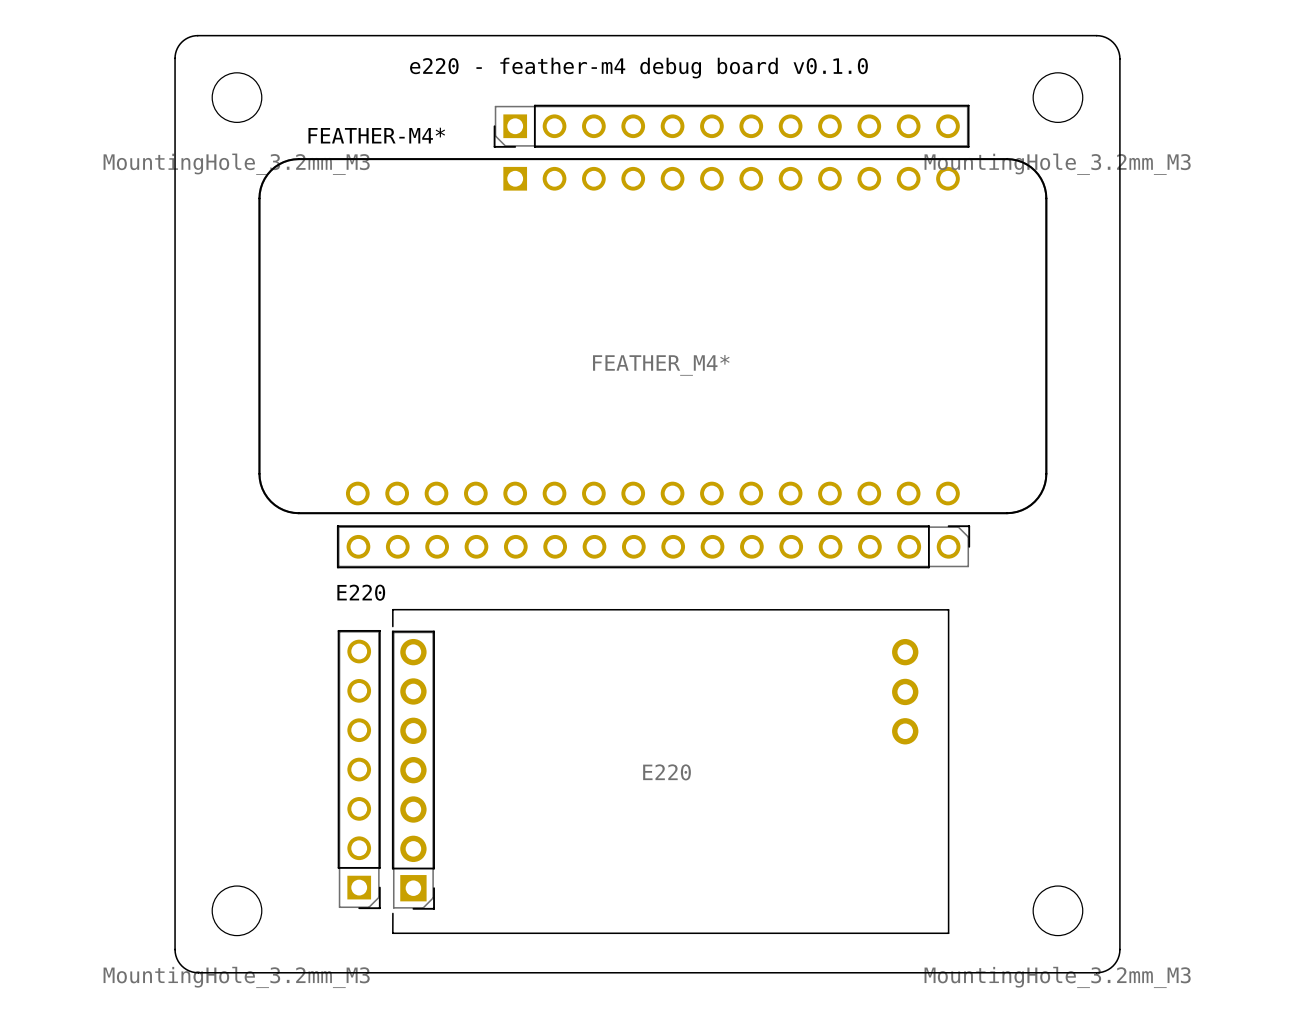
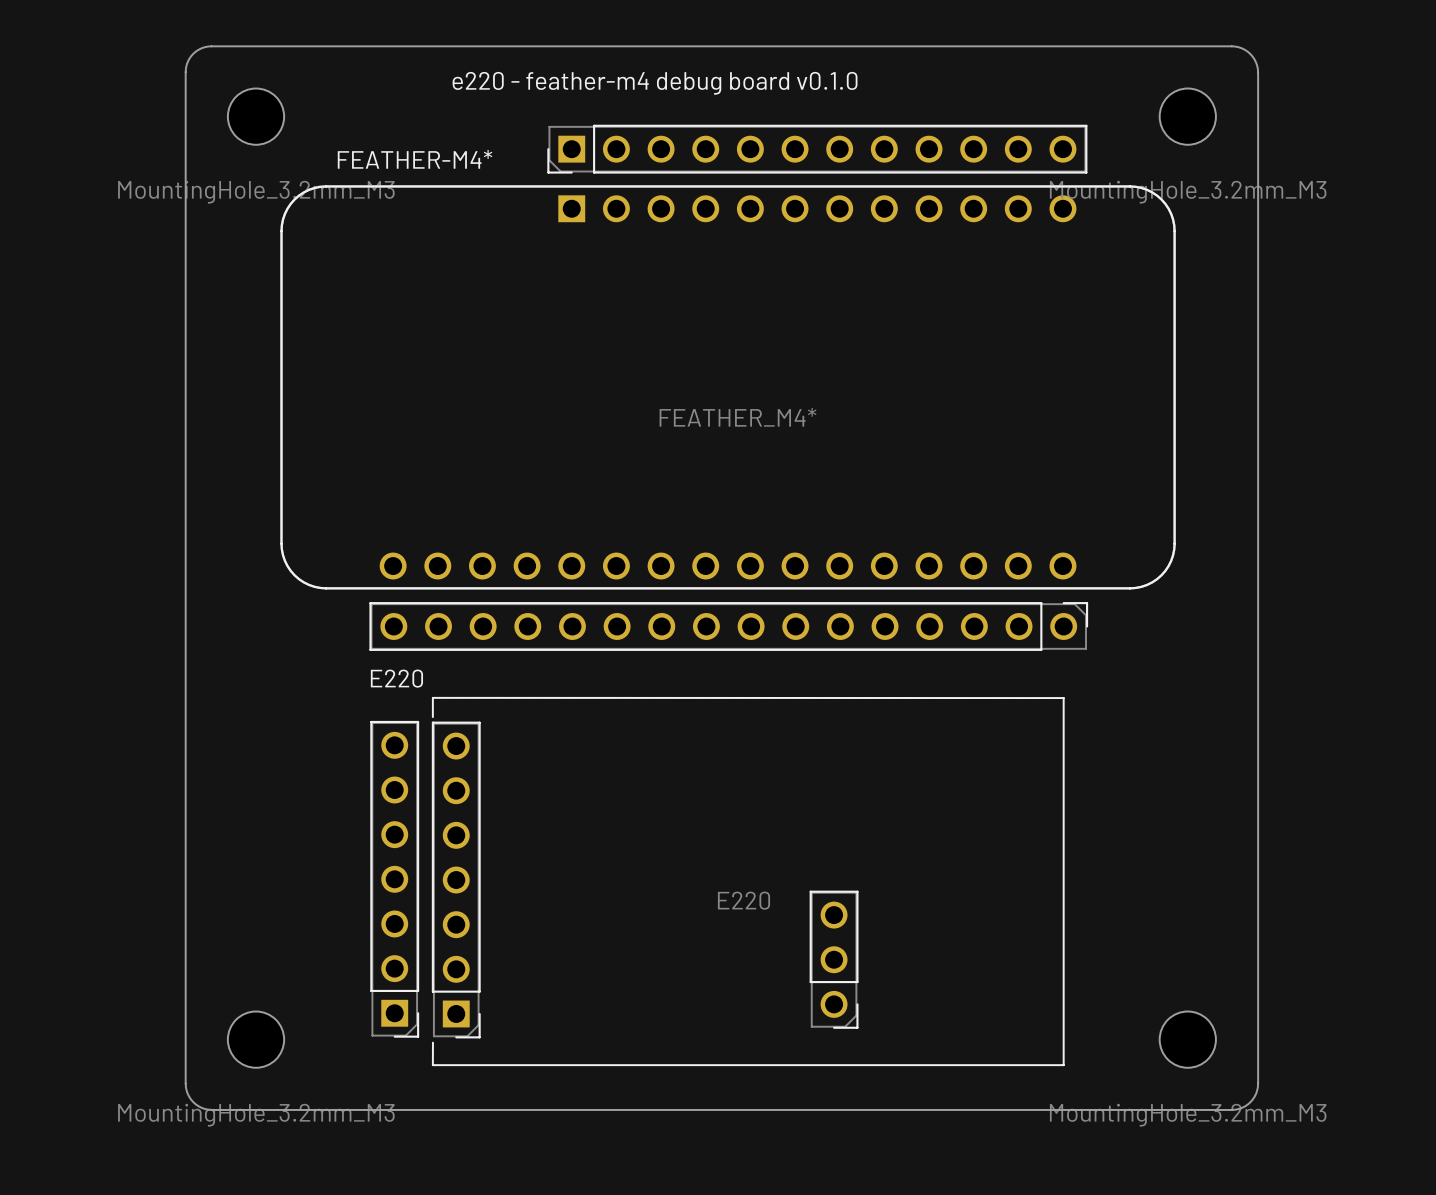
E220 footprint: [391, 608, 950, 935] -> [431, 696, 1065, 1067]
part: none -> (834, 959)

